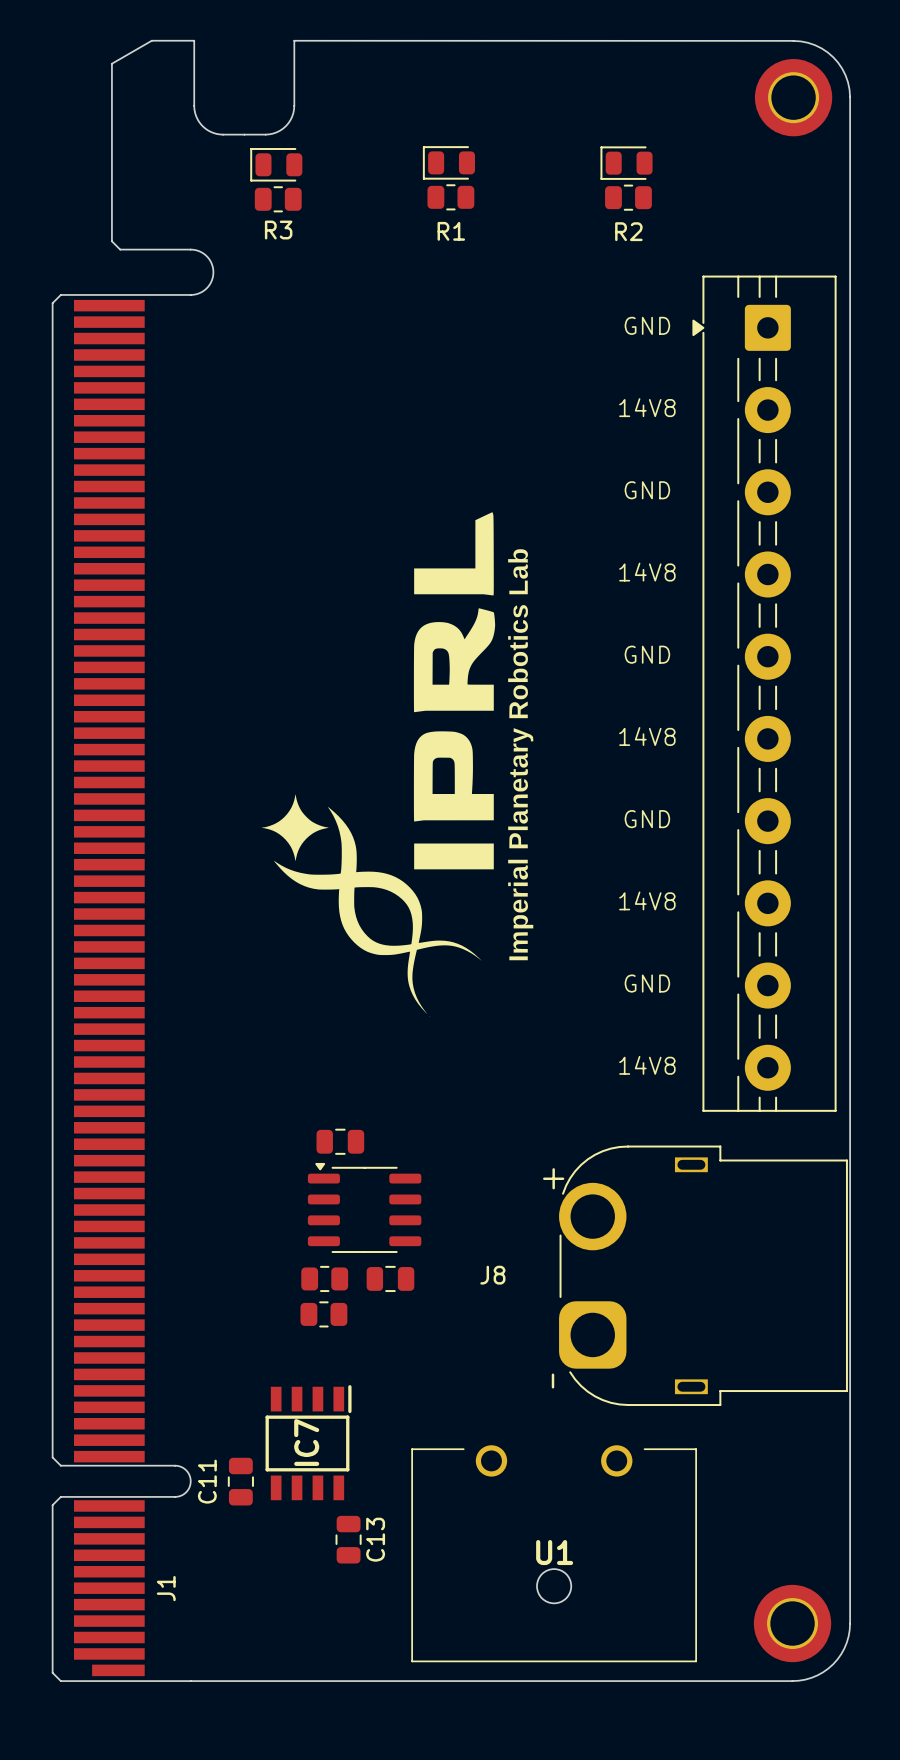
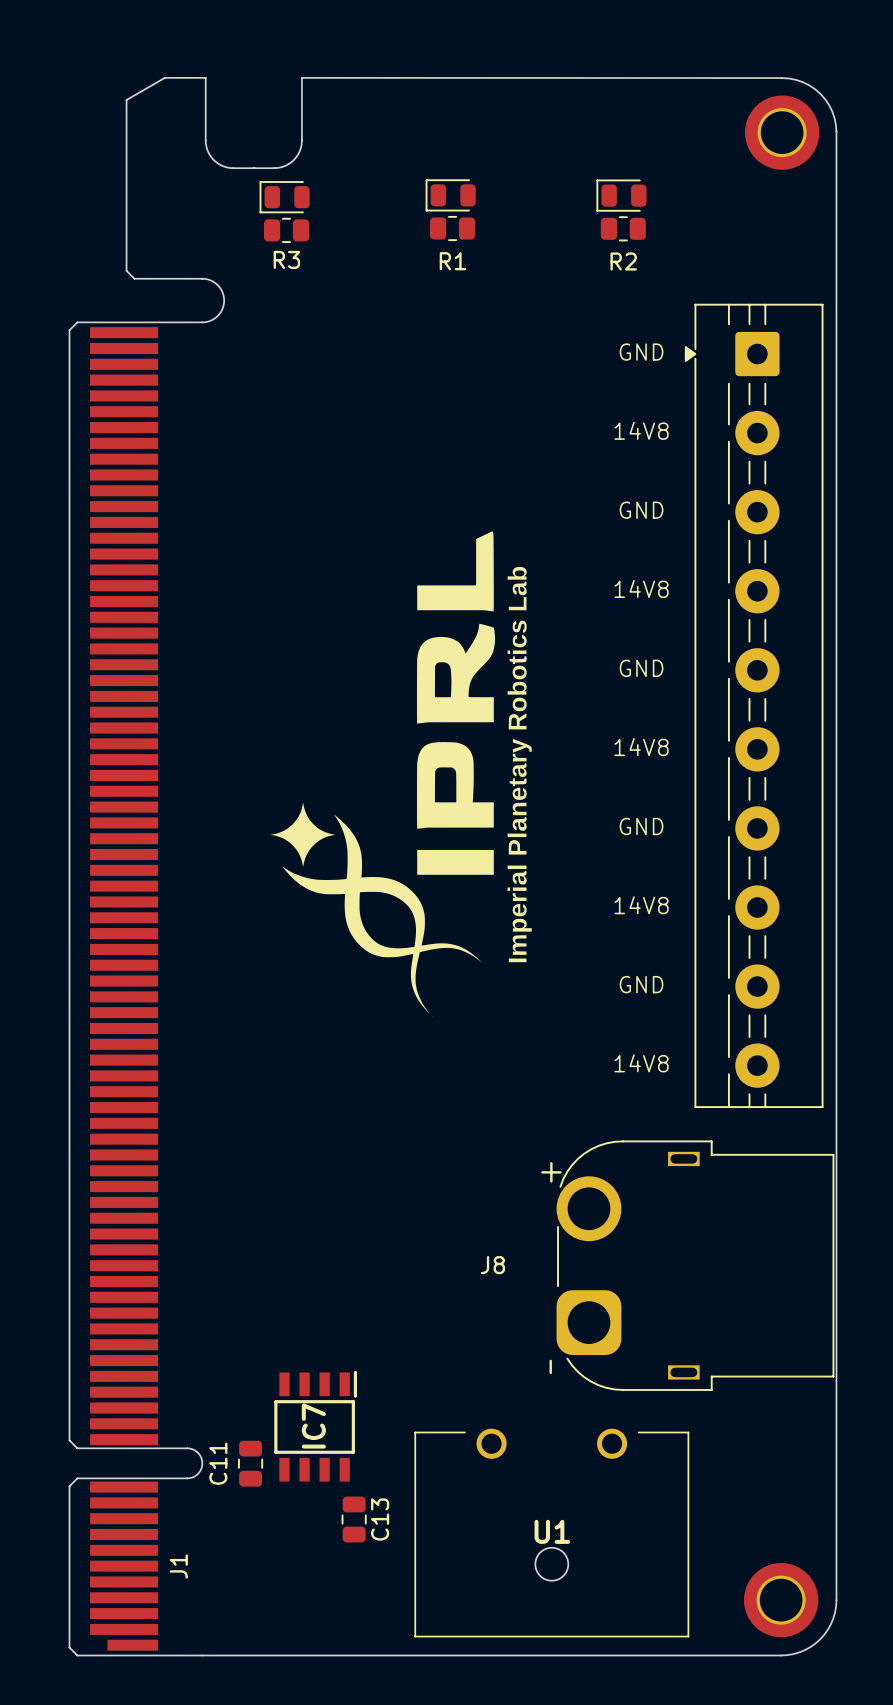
part: (340, 1141) -> none
part: (364, 1207) -> none
part: (324, 1278) -> none
part: (390, 1278) -> none
part: (323, 1314) -> none

